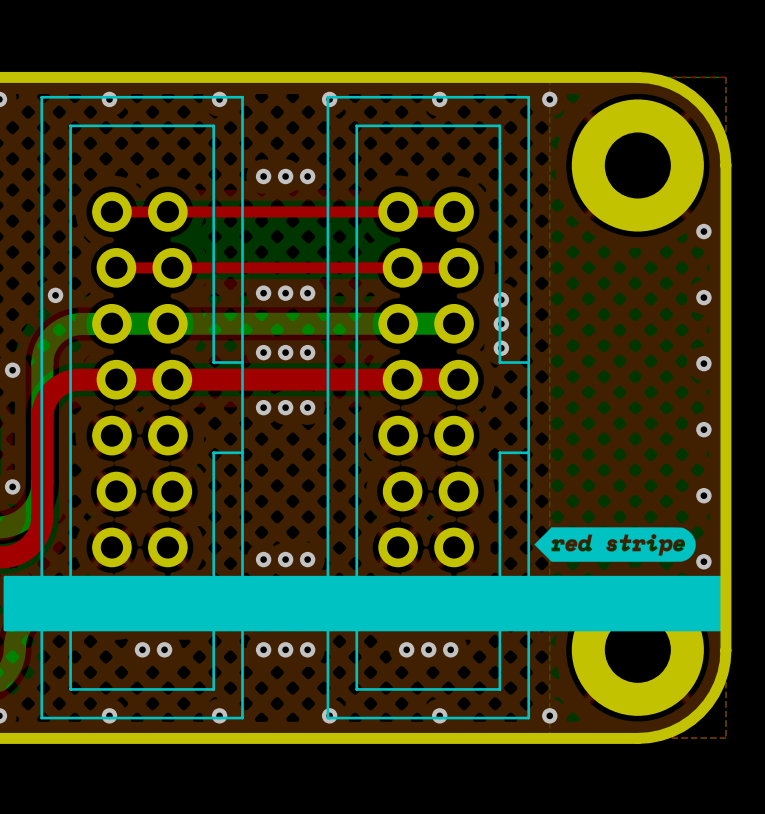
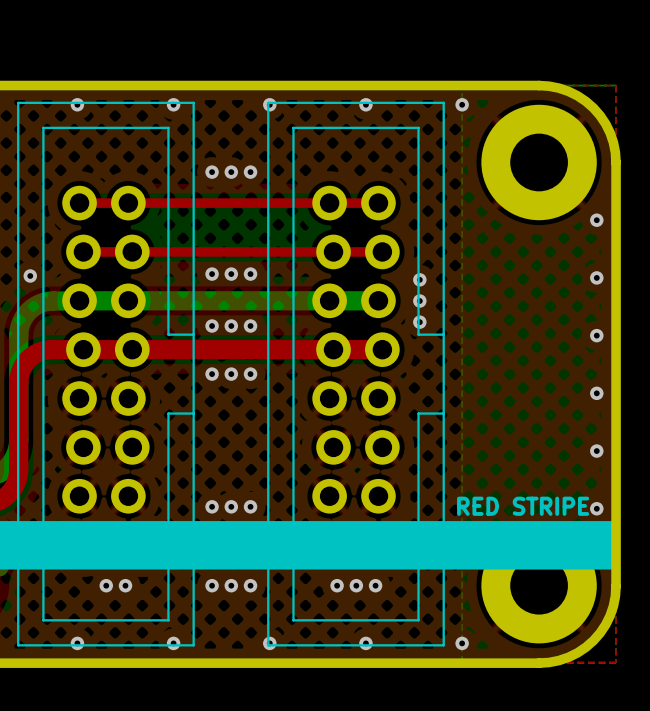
drawing: [534, 527, 696, 562] -> none
text: none -> RED STRIPE (523, 506)

